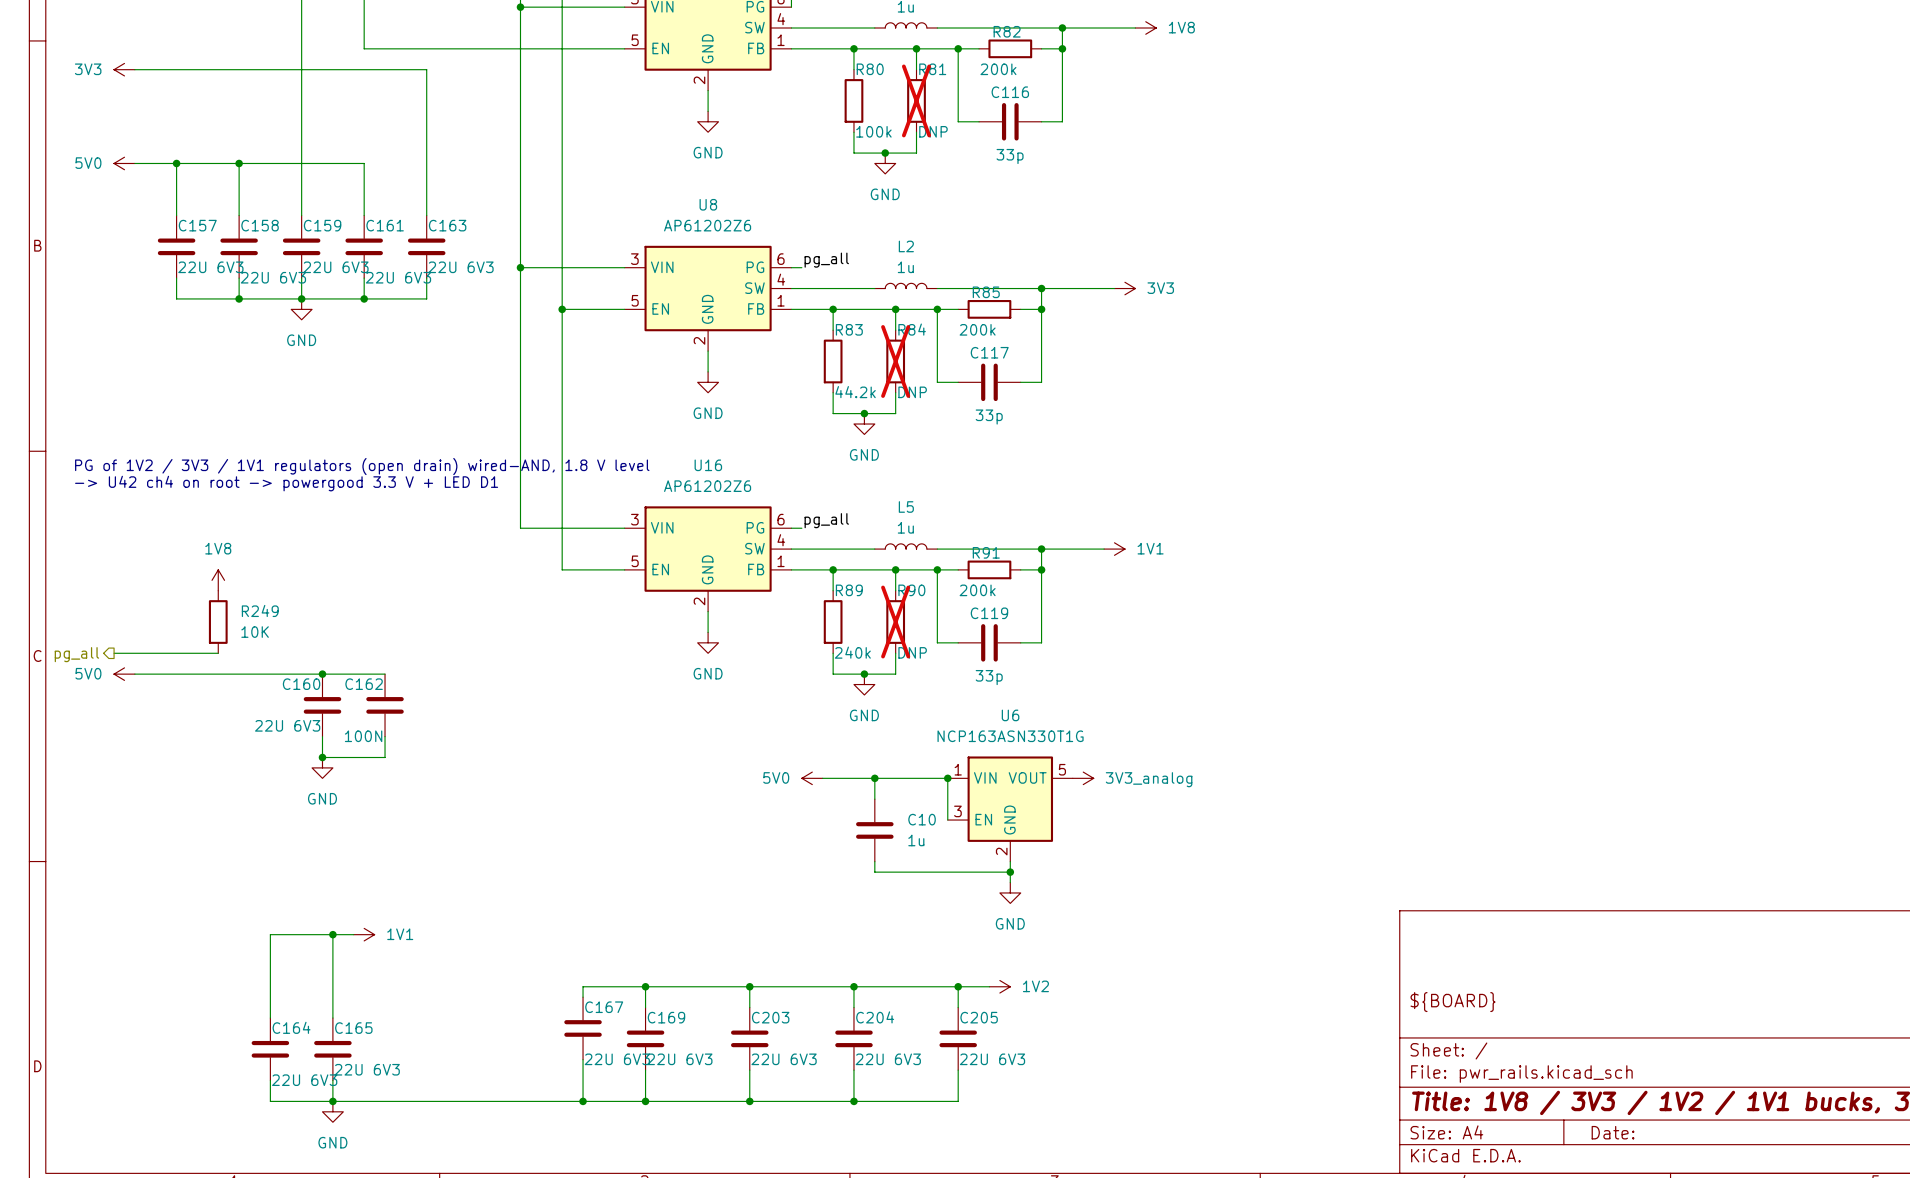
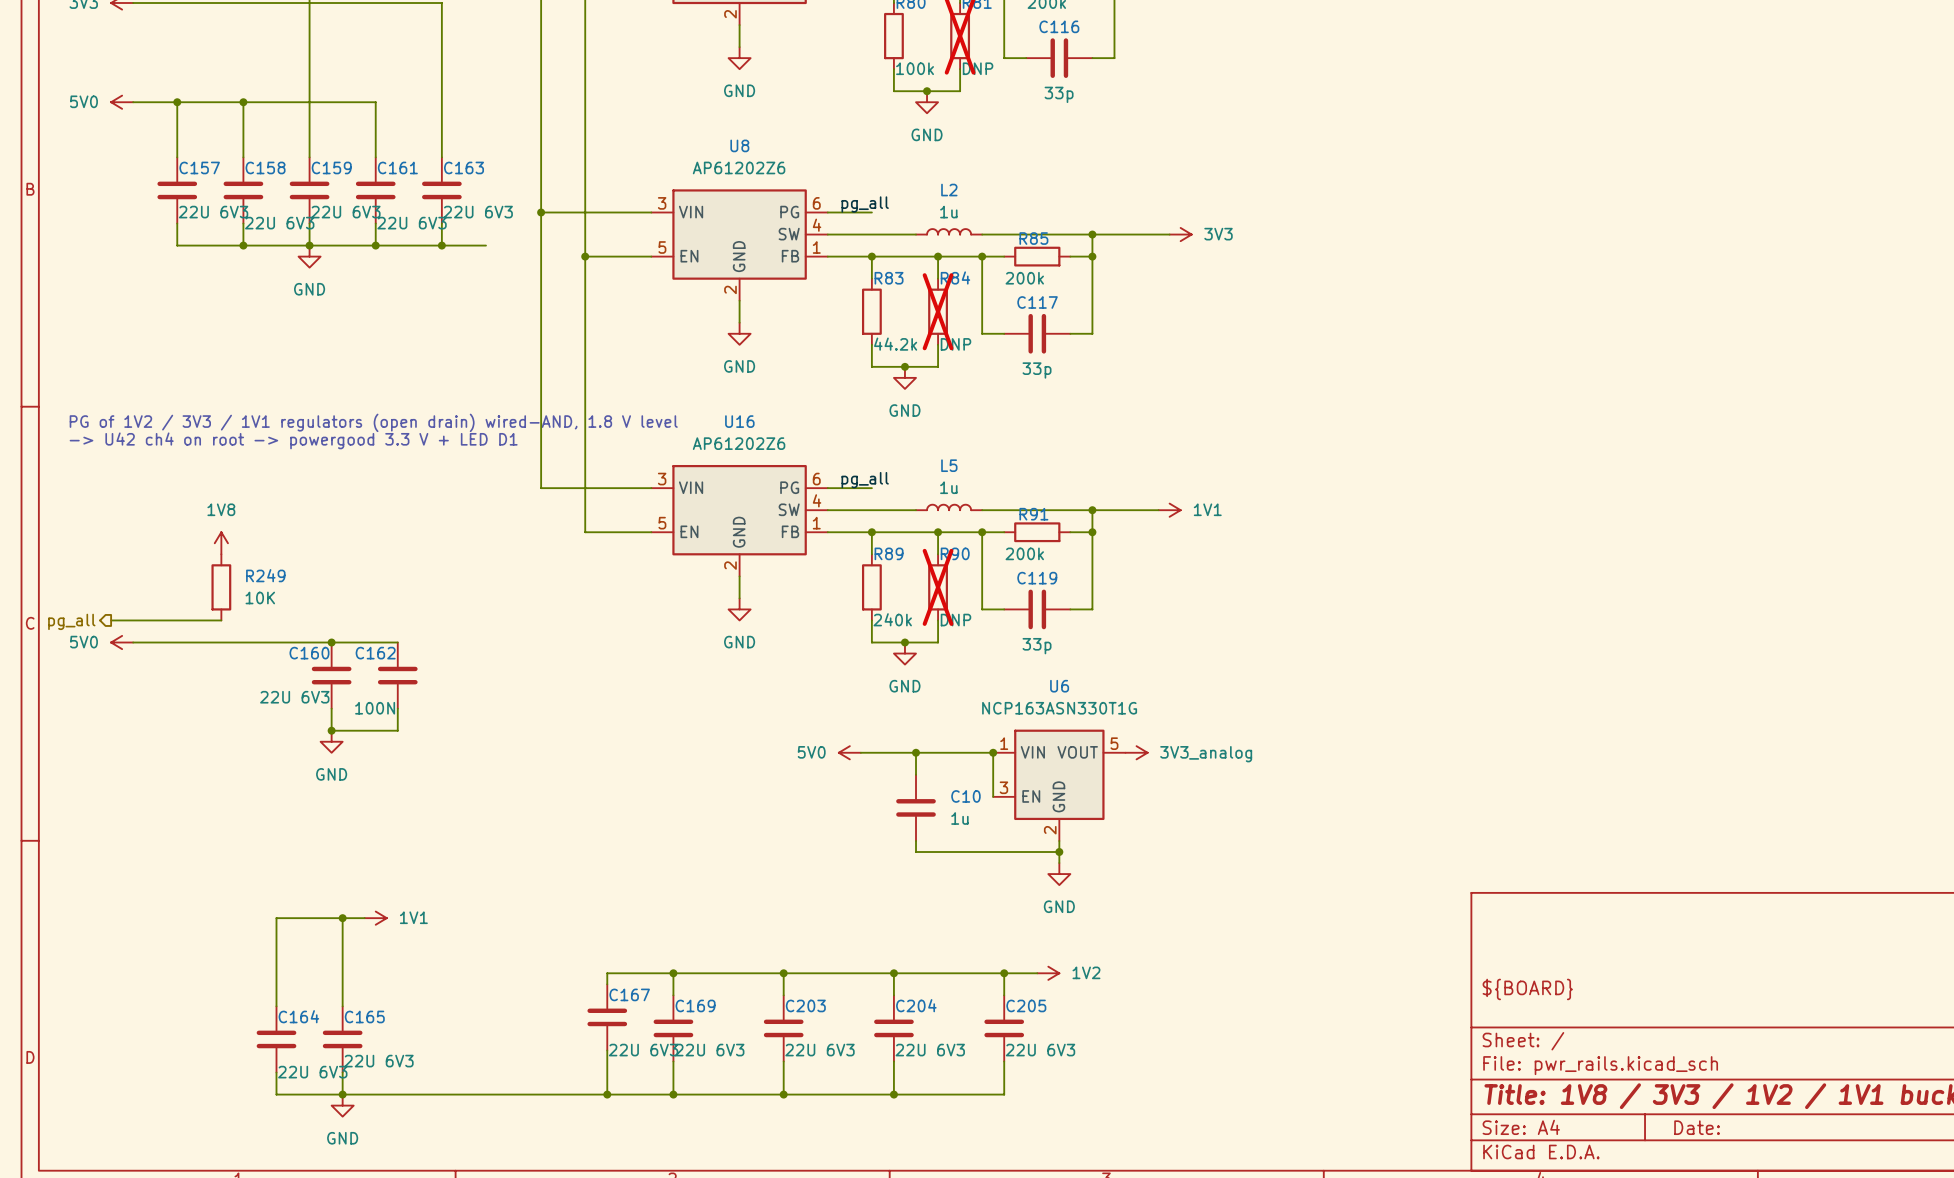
wire: none -> (838, 212) (871, 212)
wire: none -> (441, 245) (485, 245)
junction: none -> (441, 245)
wire: none -> (838, 488) (871, 488)

